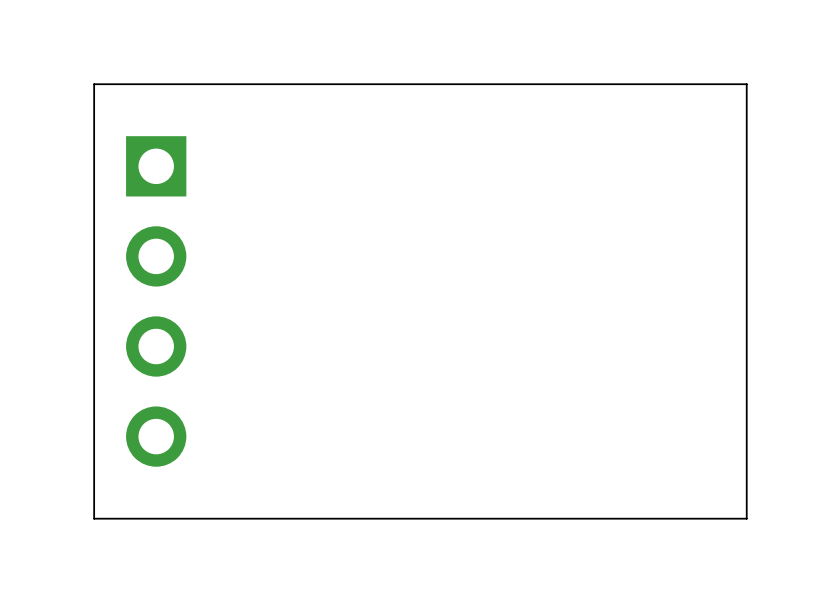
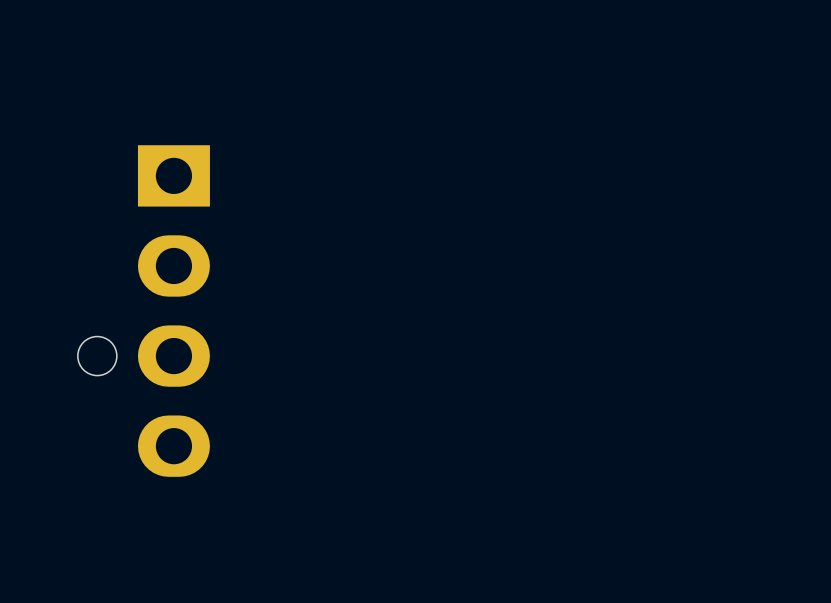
board edge: (746, 84) (94, 84) (94, 518) (746, 518) (746, 84) -> none
part footprint: [126, 136, 187, 467] -> [77, 145, 210, 477]

